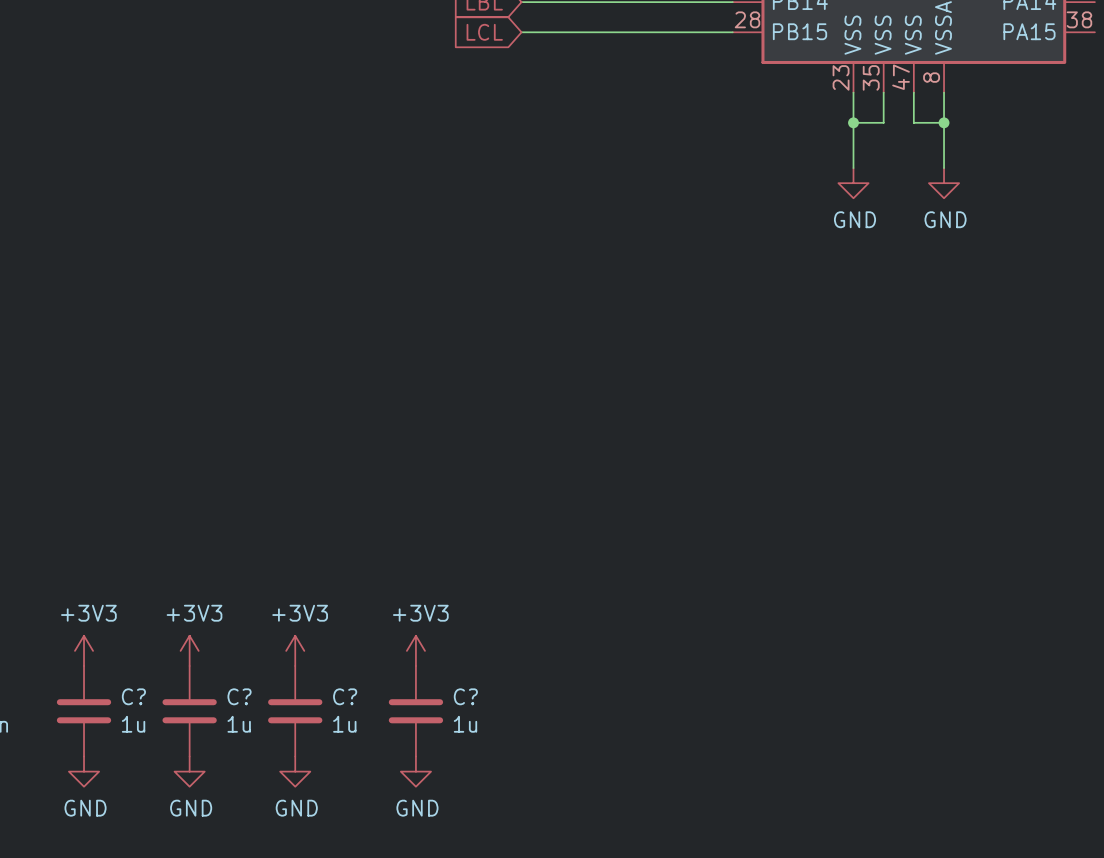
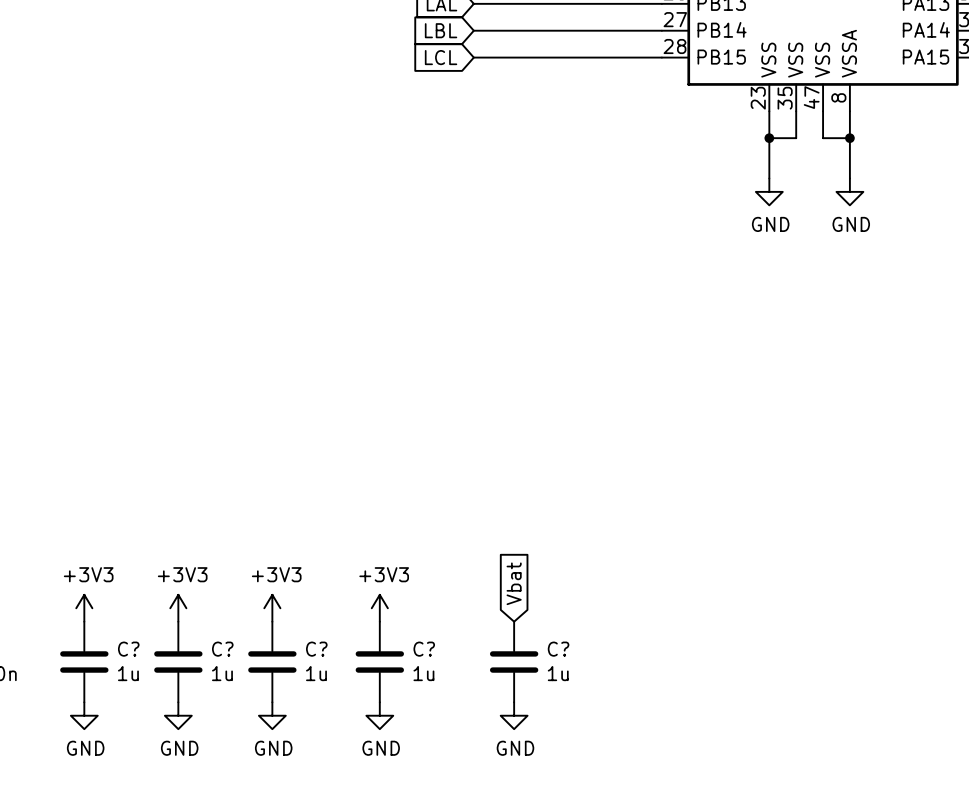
global label: none -> Vbat (514, 583)
C?: none -> 1u (514, 661)
power symbol: none -> GND (514, 715)

